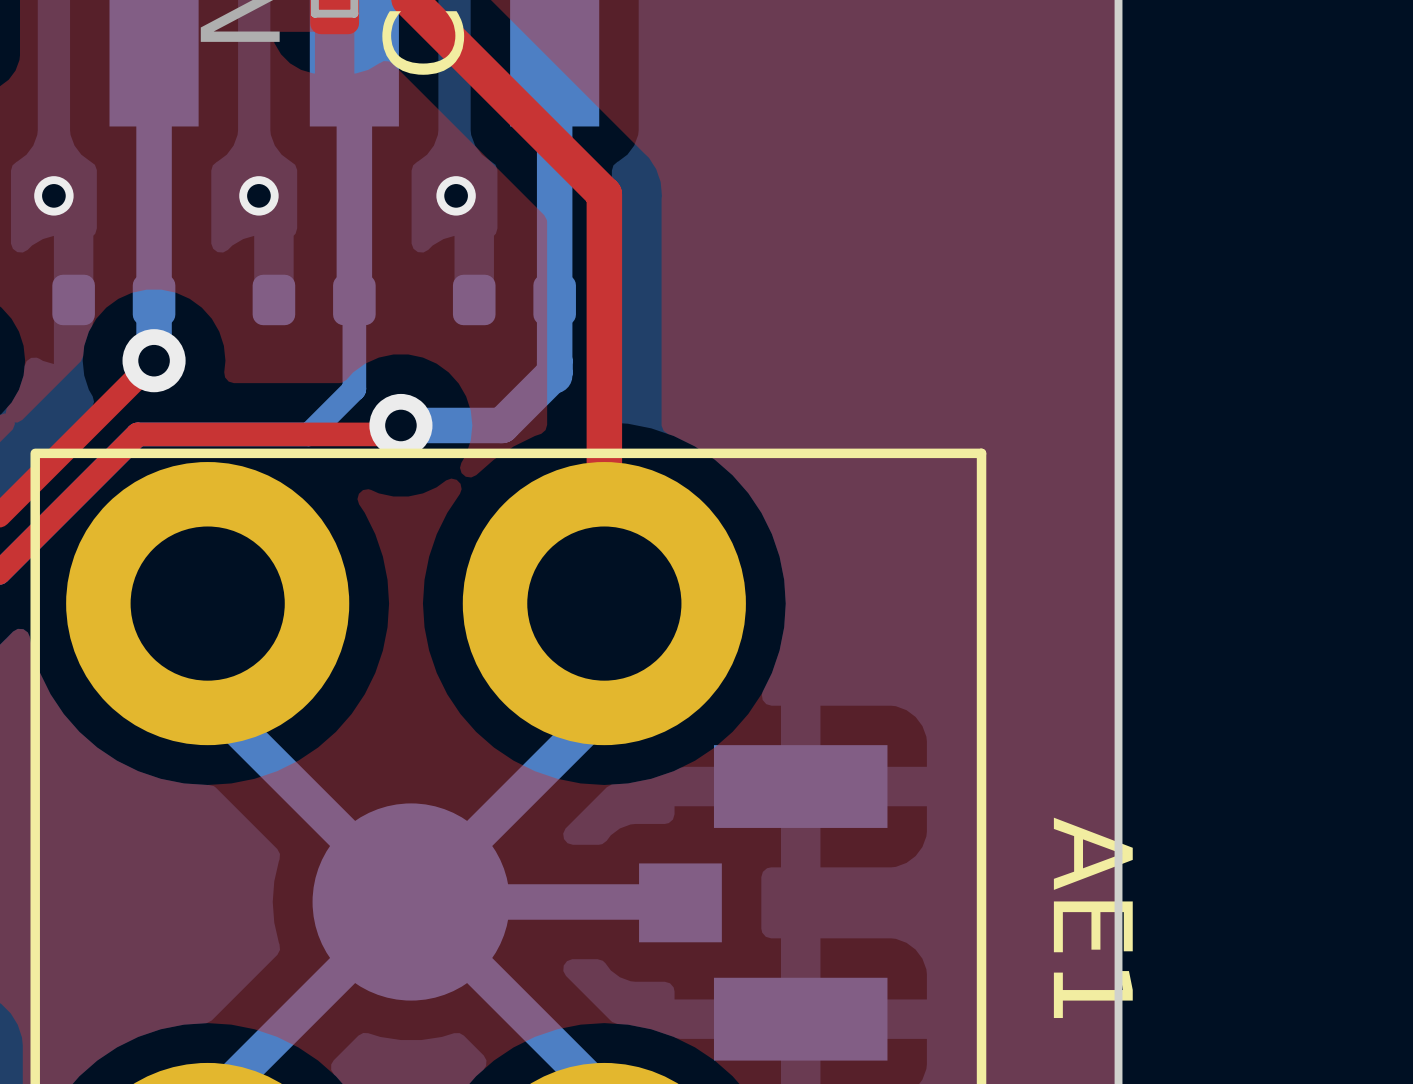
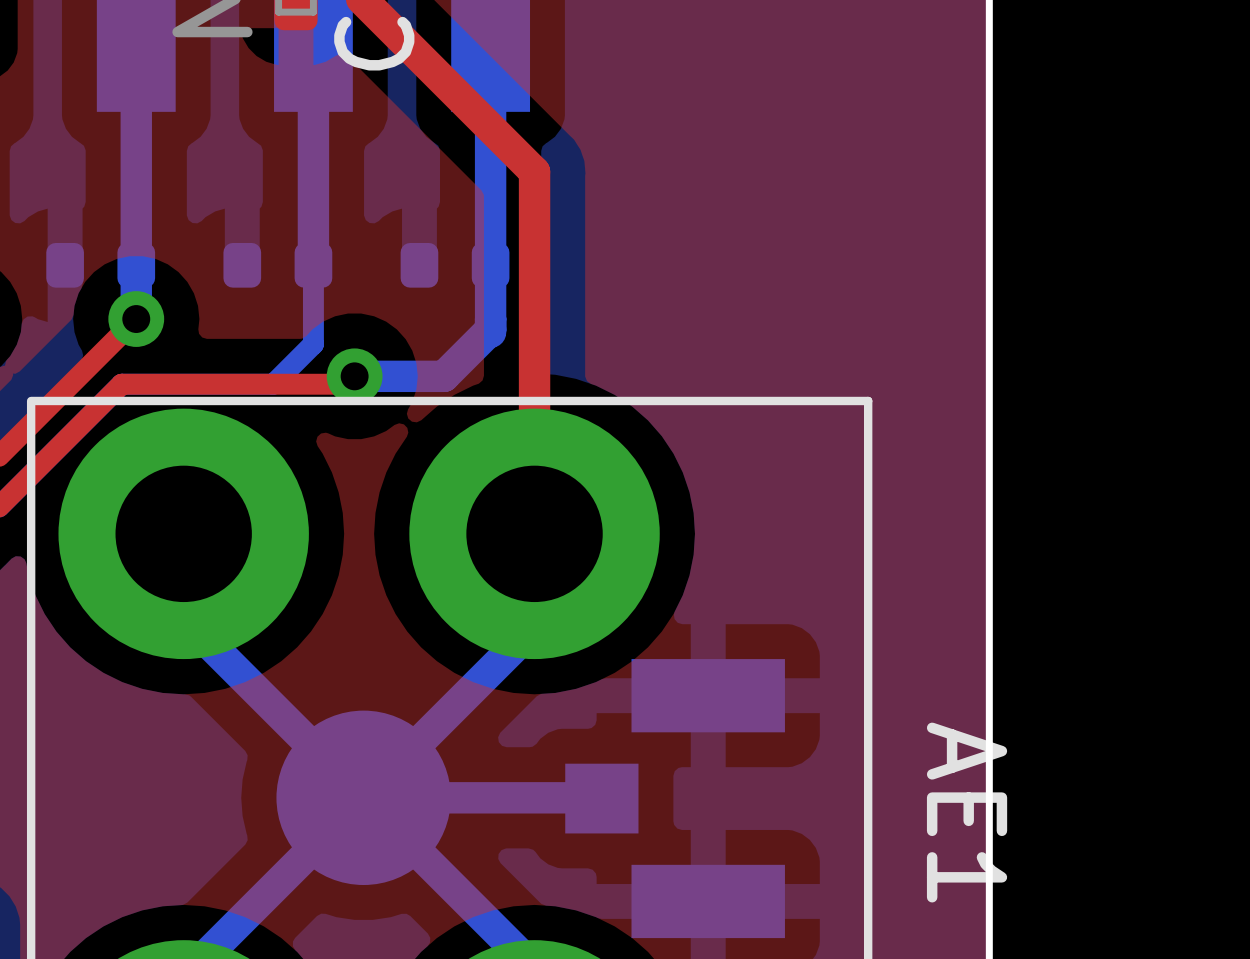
via: (53, 195) -> none
via: (258, 195) -> none
via: (456, 195) -> none

